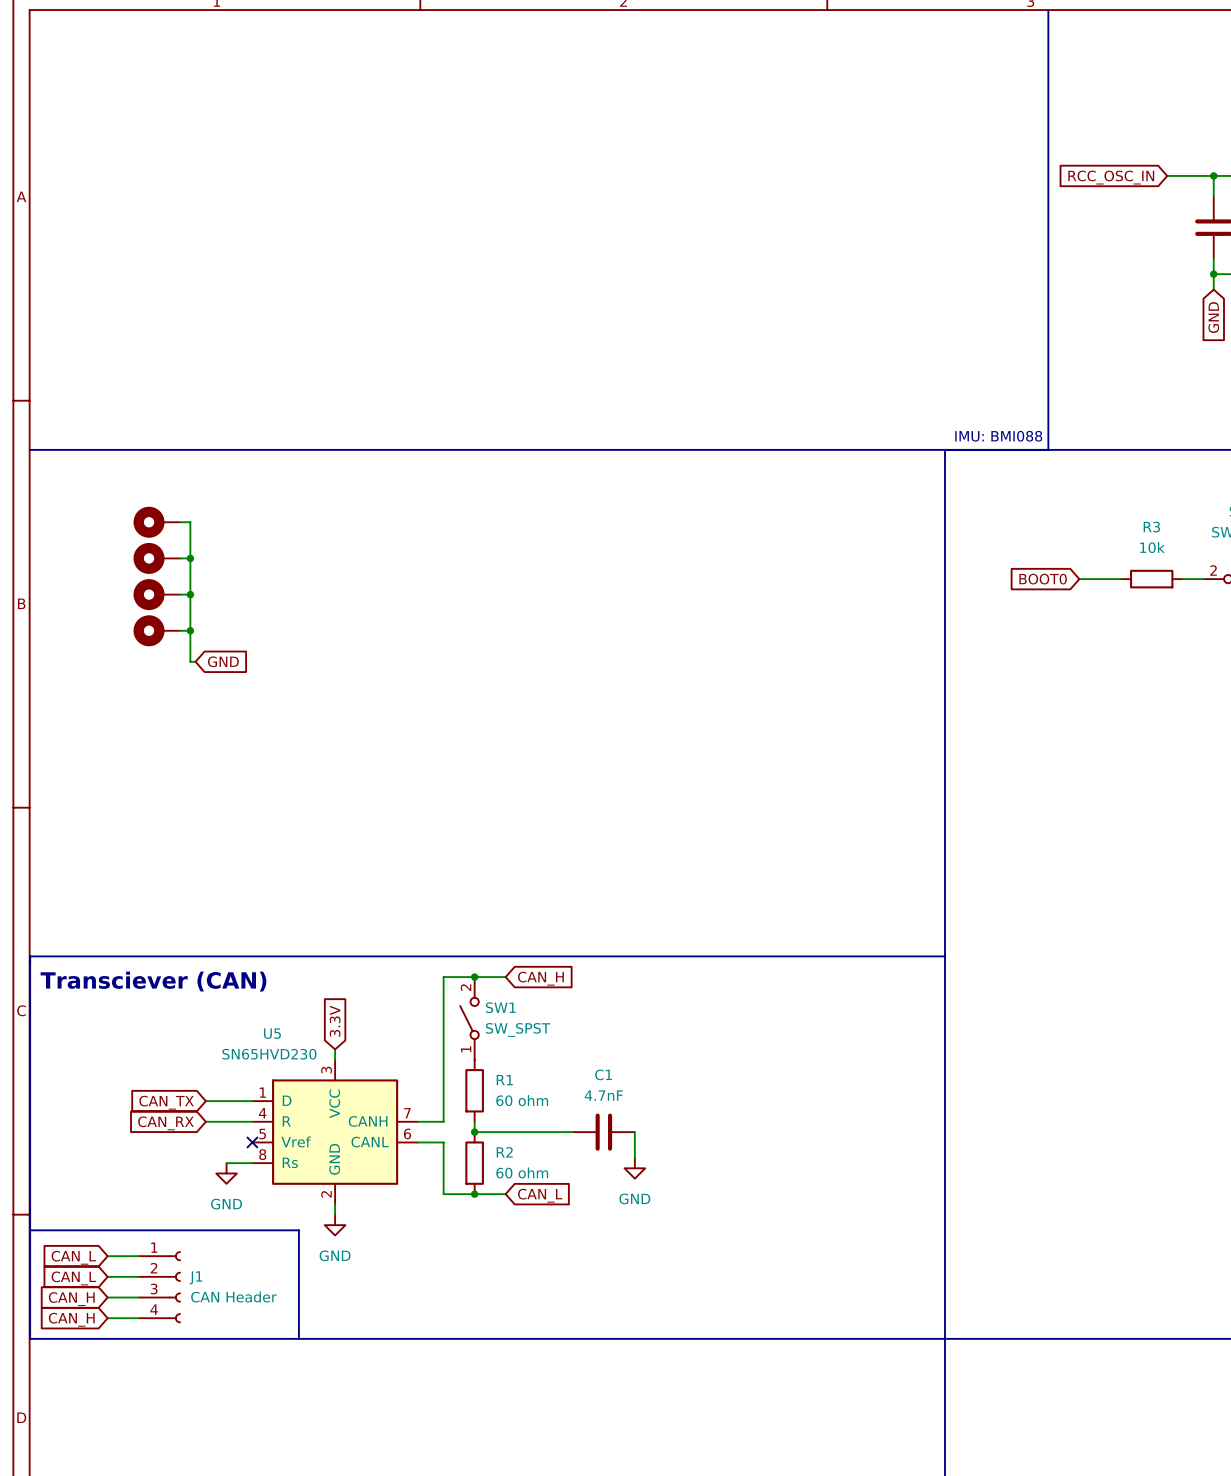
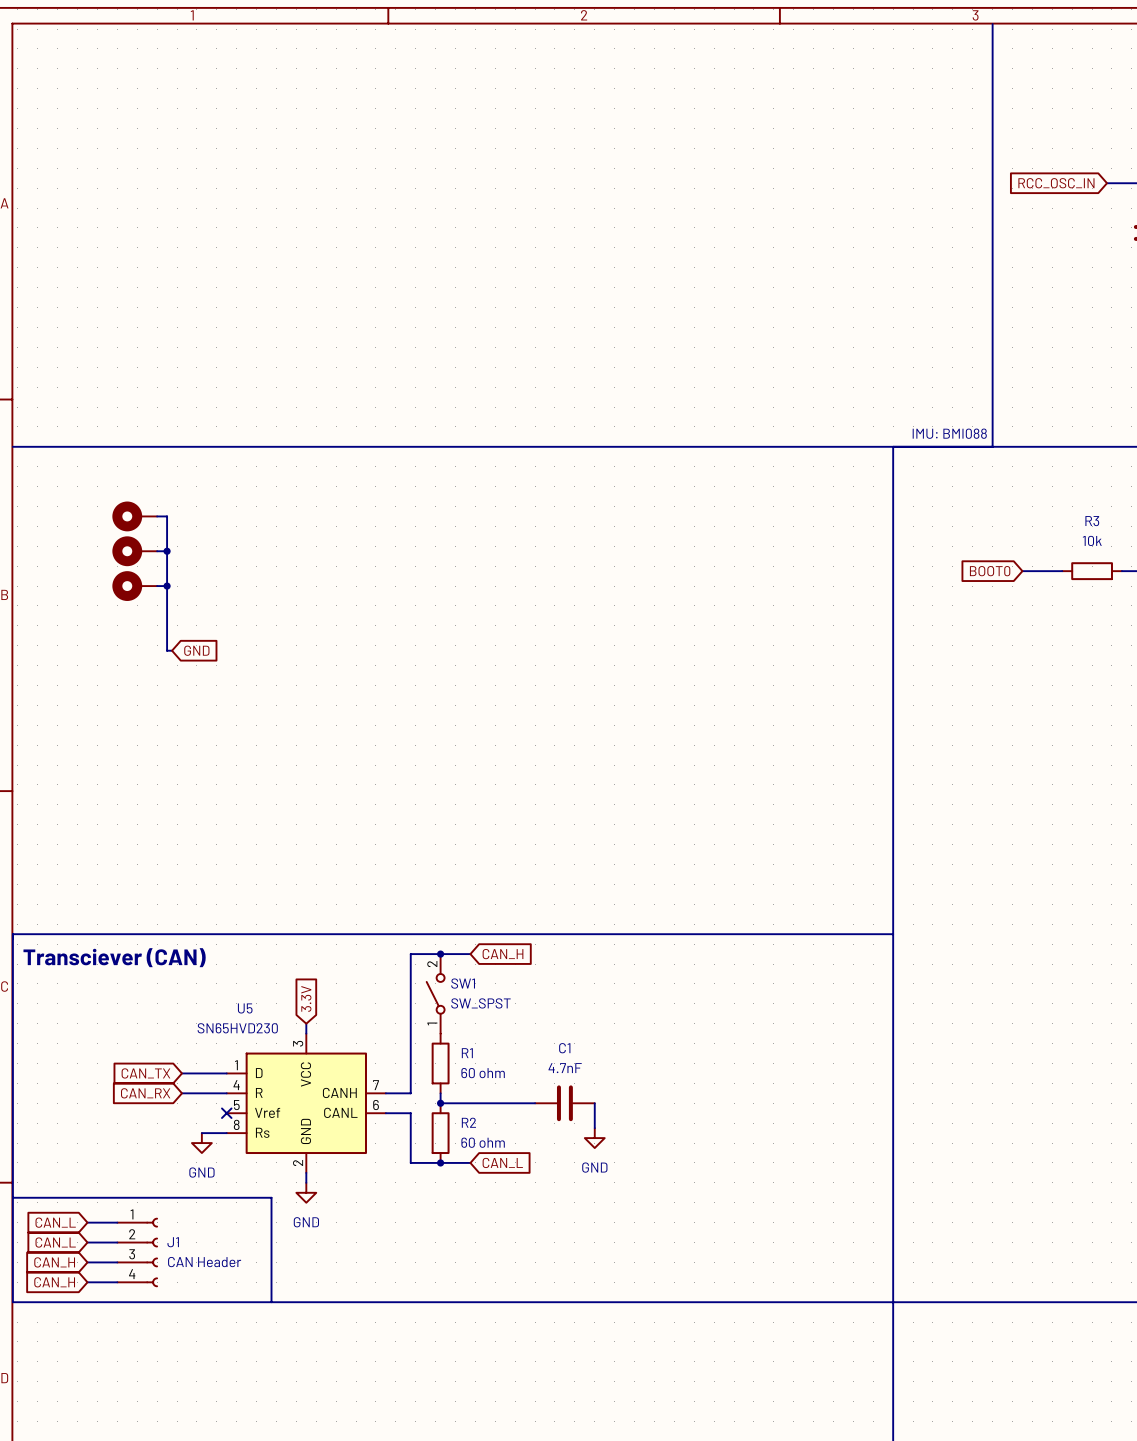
part: (156, 630) -> none
wire: (180, 630) (190, 630) -> none
junction: (190, 630) -> none

